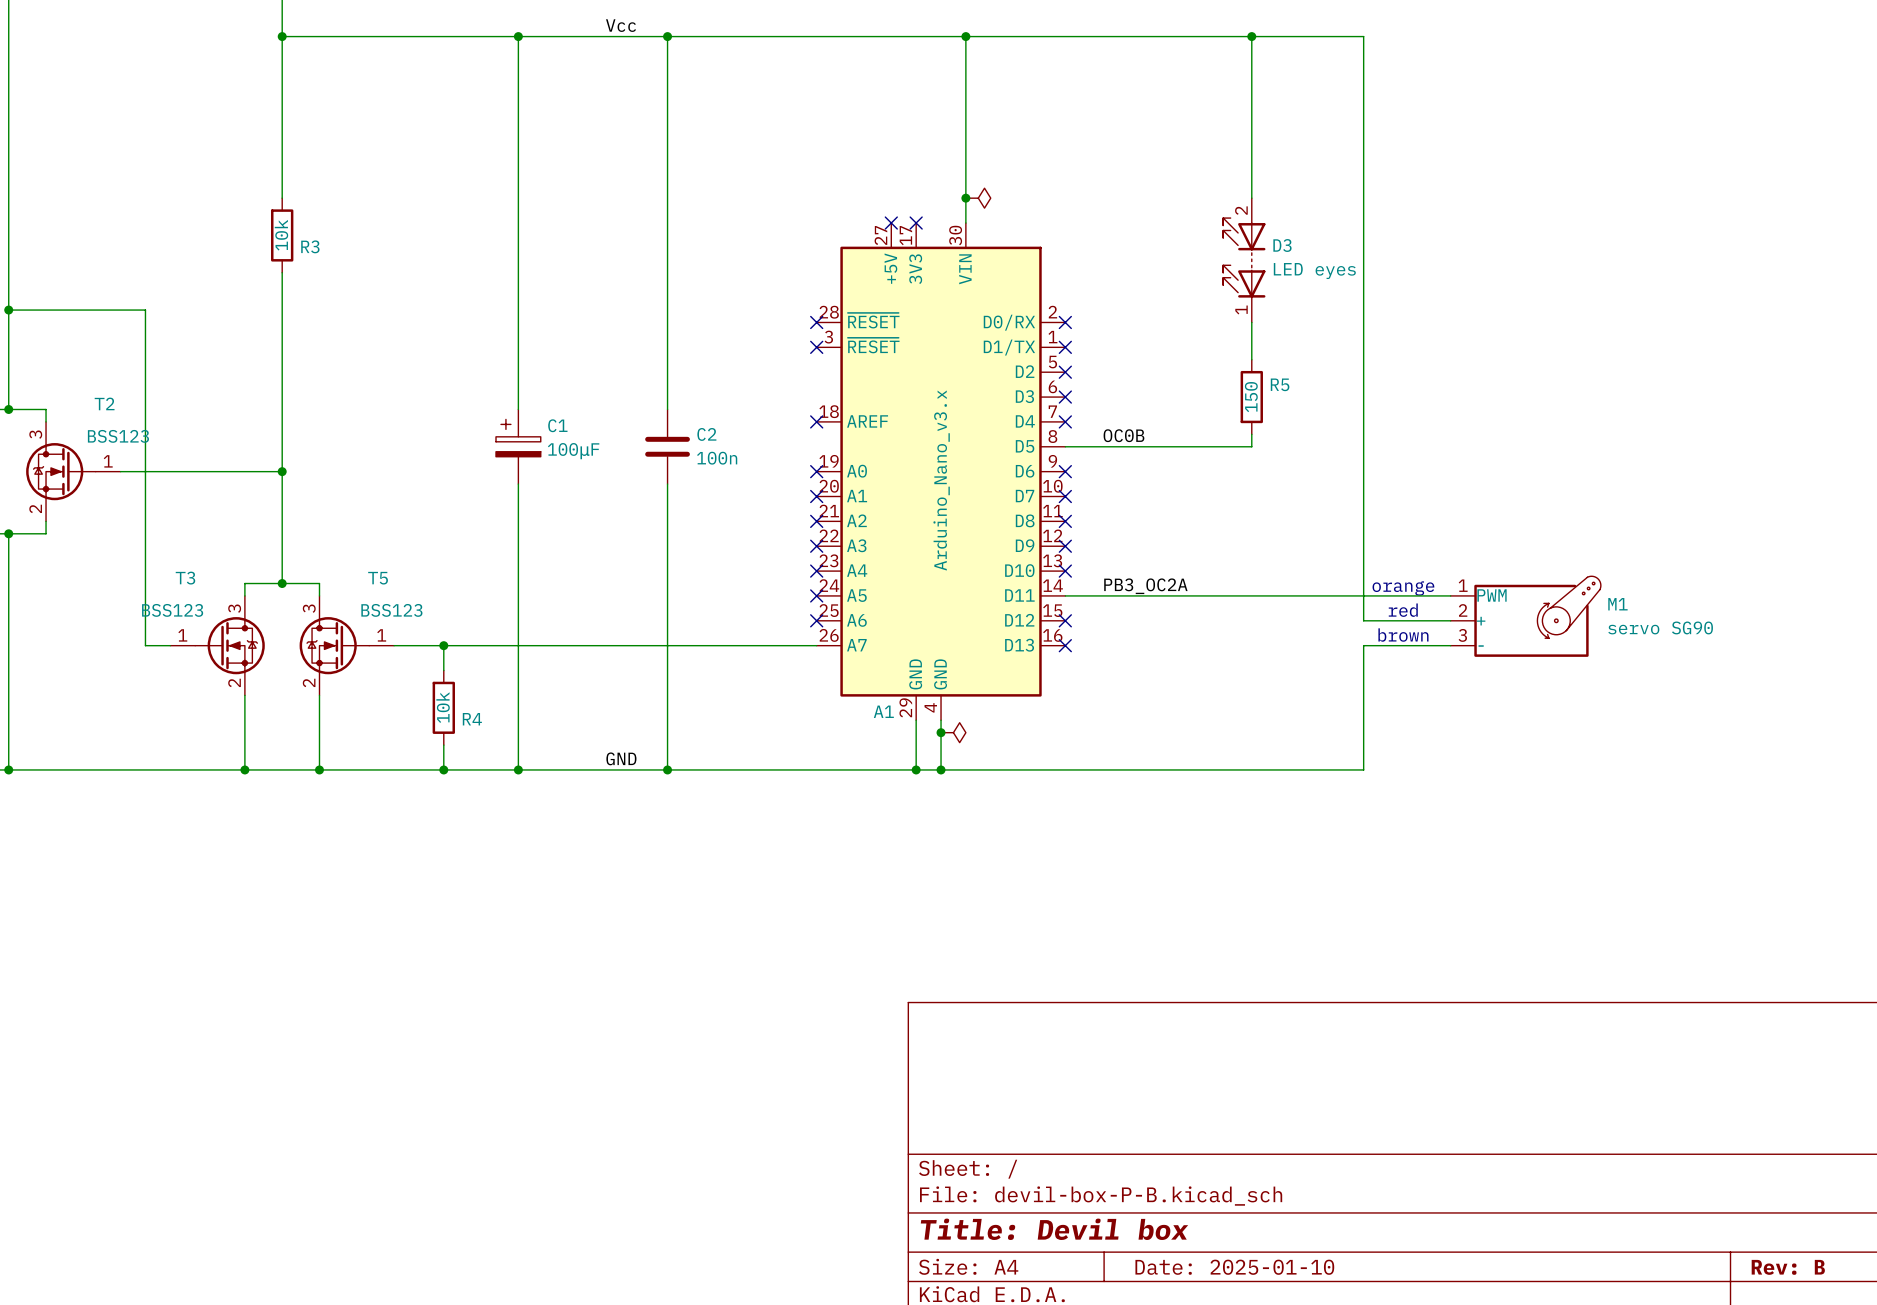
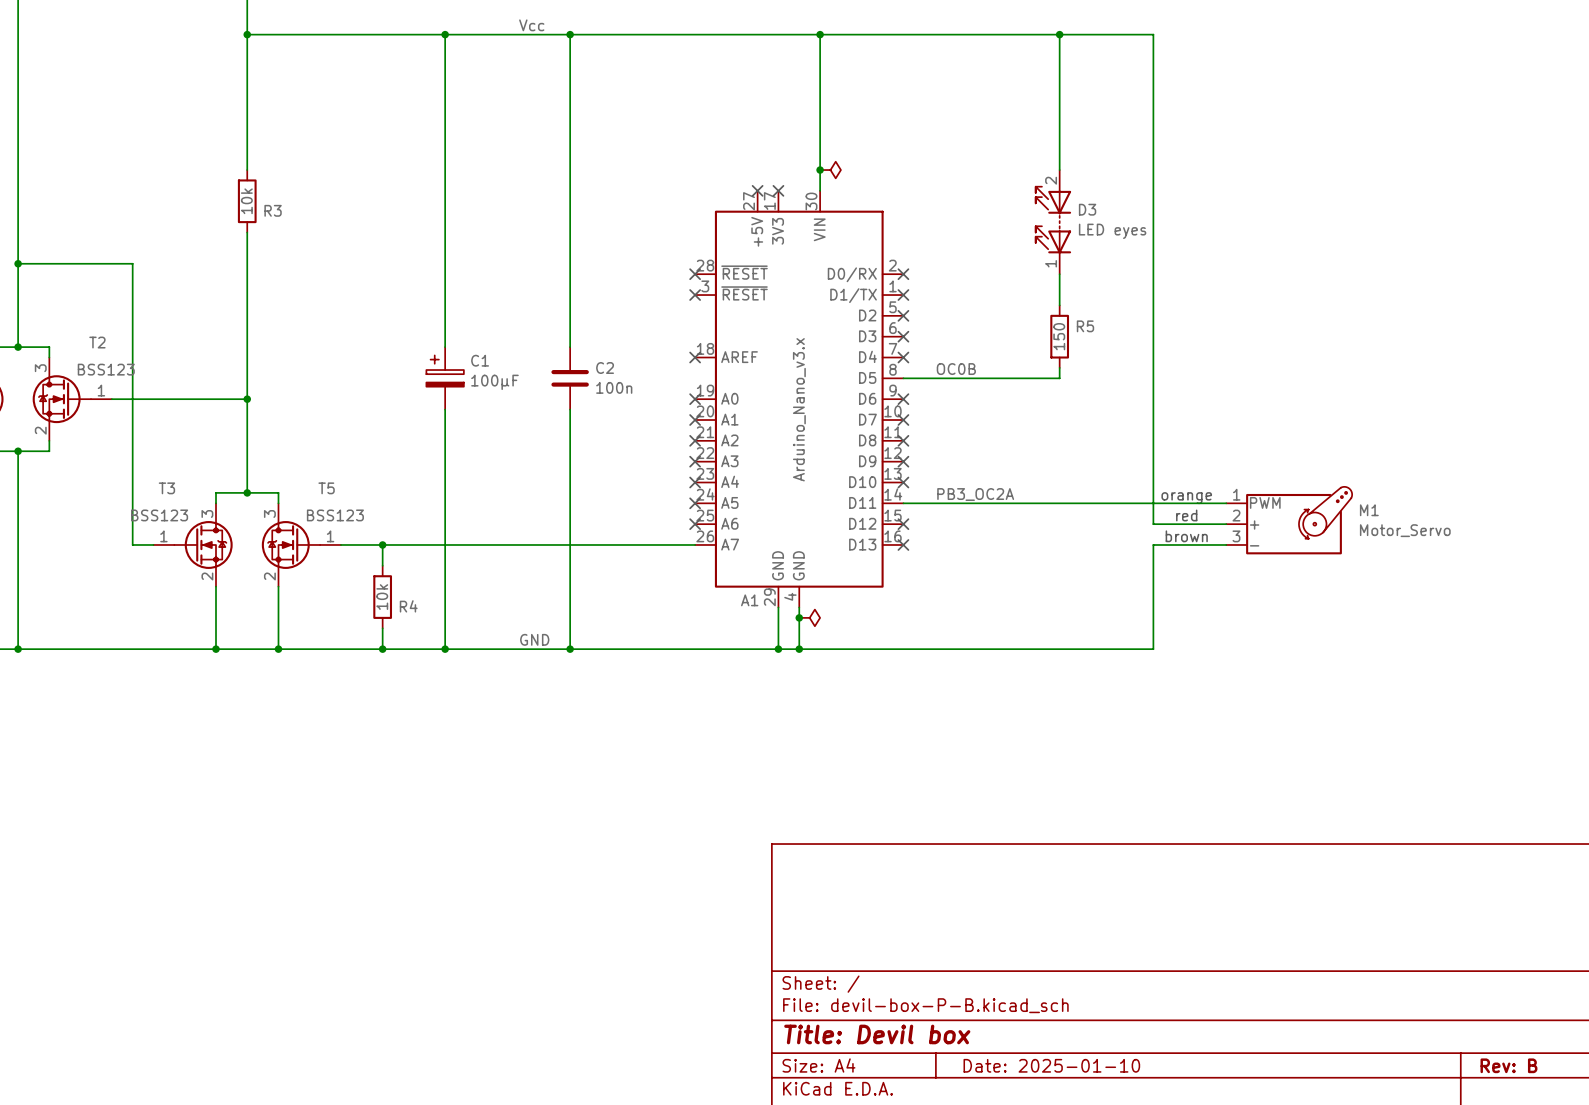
M1 value: servo SG90 (1660, 627) -> Motor_Servo (1405, 530)

